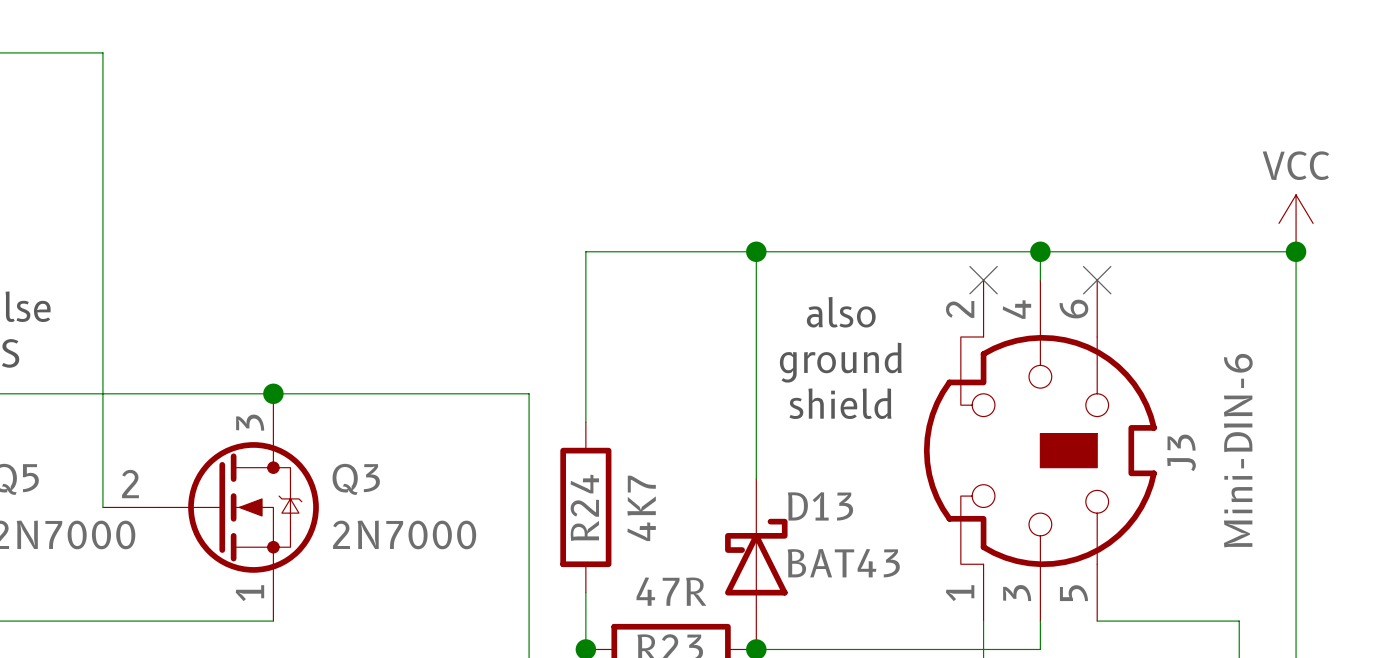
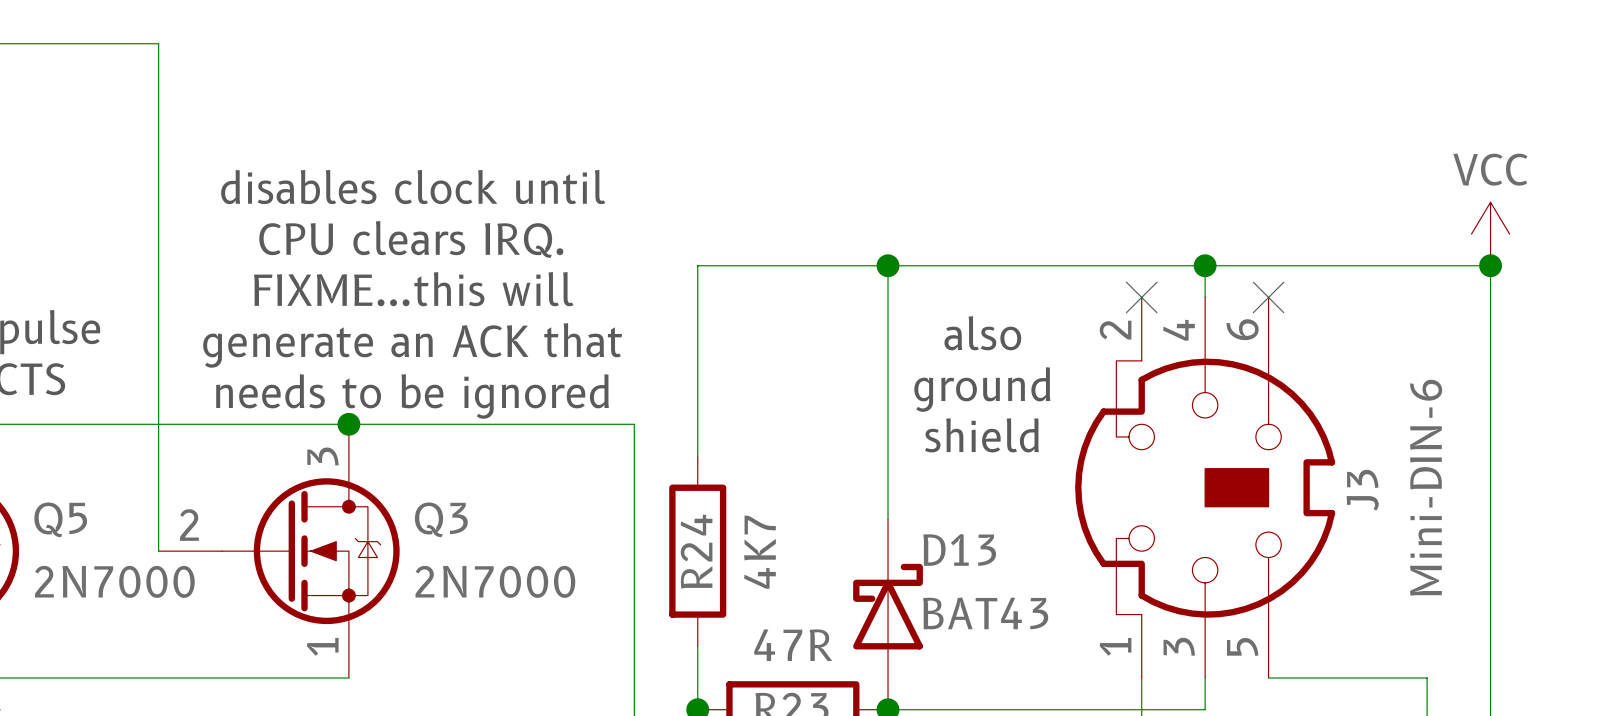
text: none -> disables clock until (413, 187)
text: none -> CPU clears IRQ. (411, 239)
text: none -> FIXME...this will (413, 289)
text: none -> generate an ACK that (412, 345)
text: none -> needs to be ignored (412, 396)

